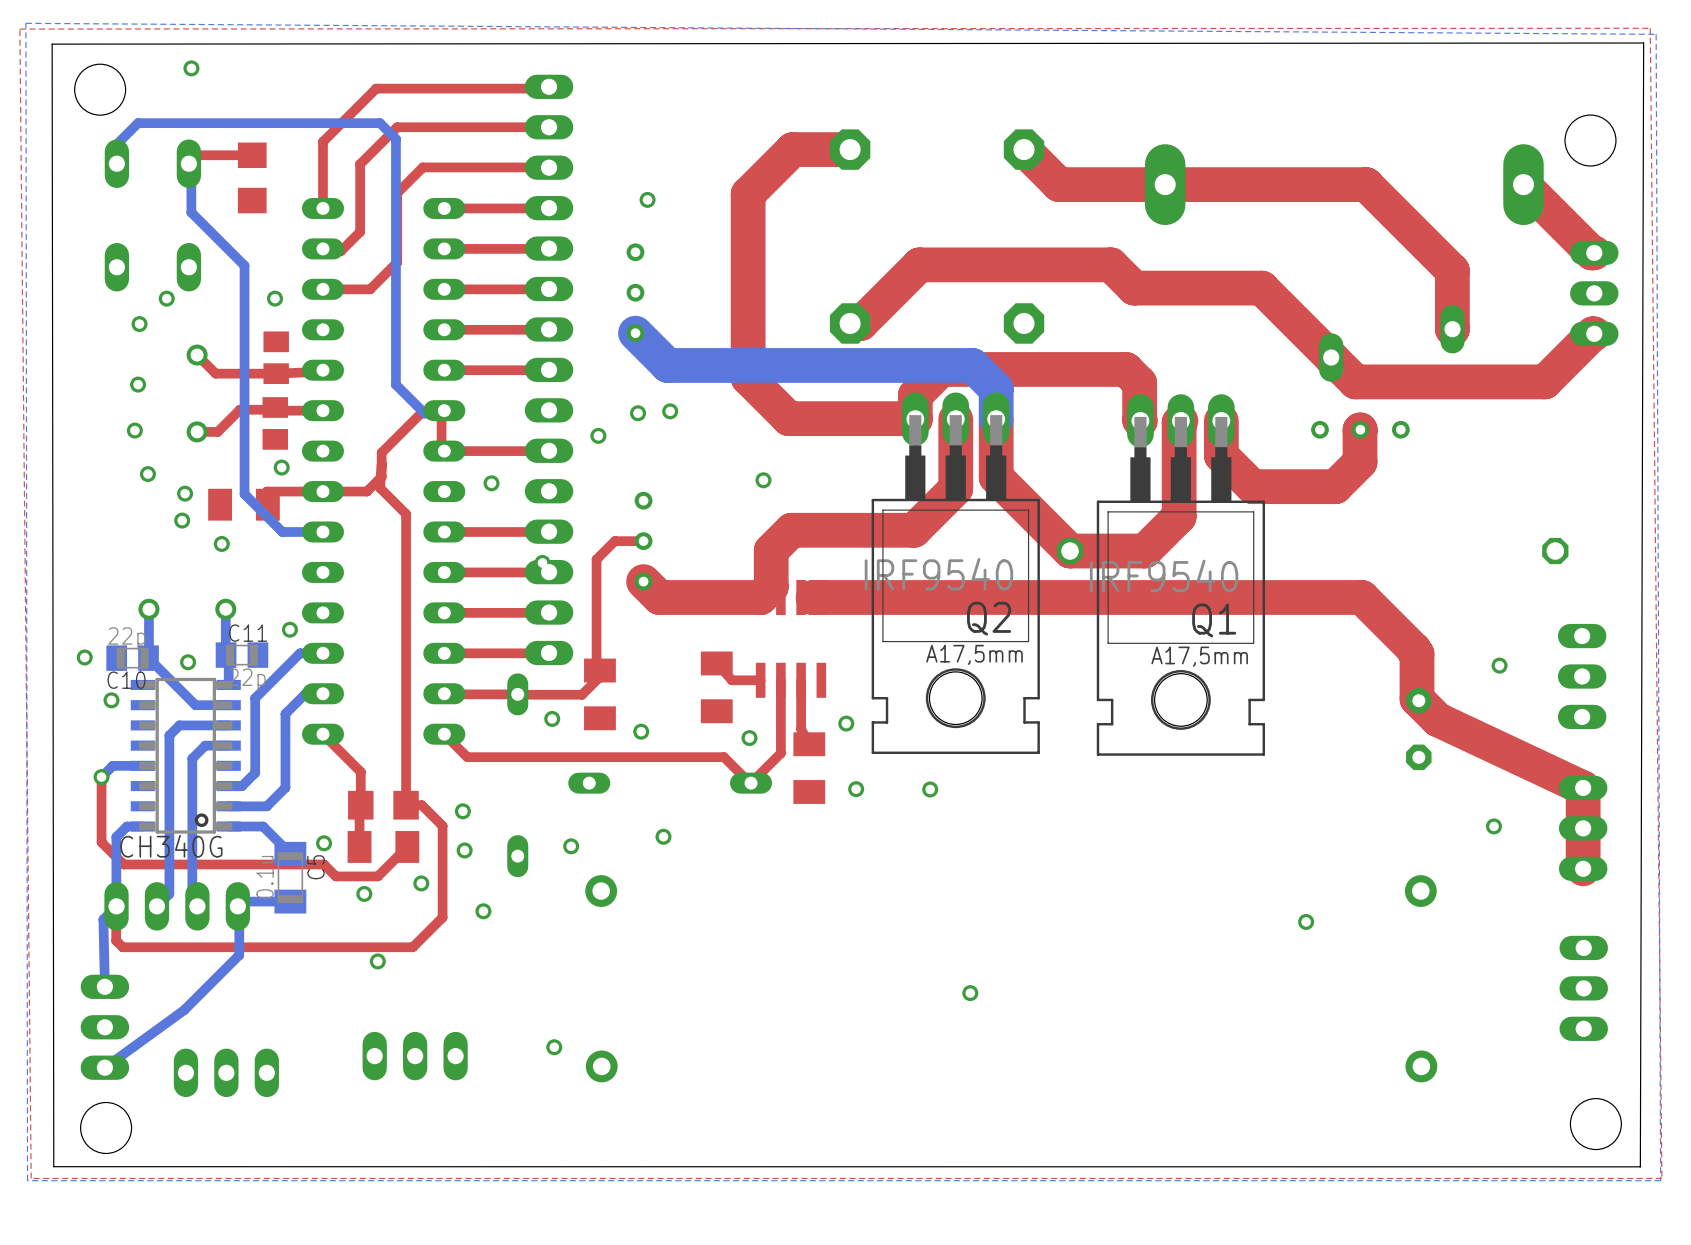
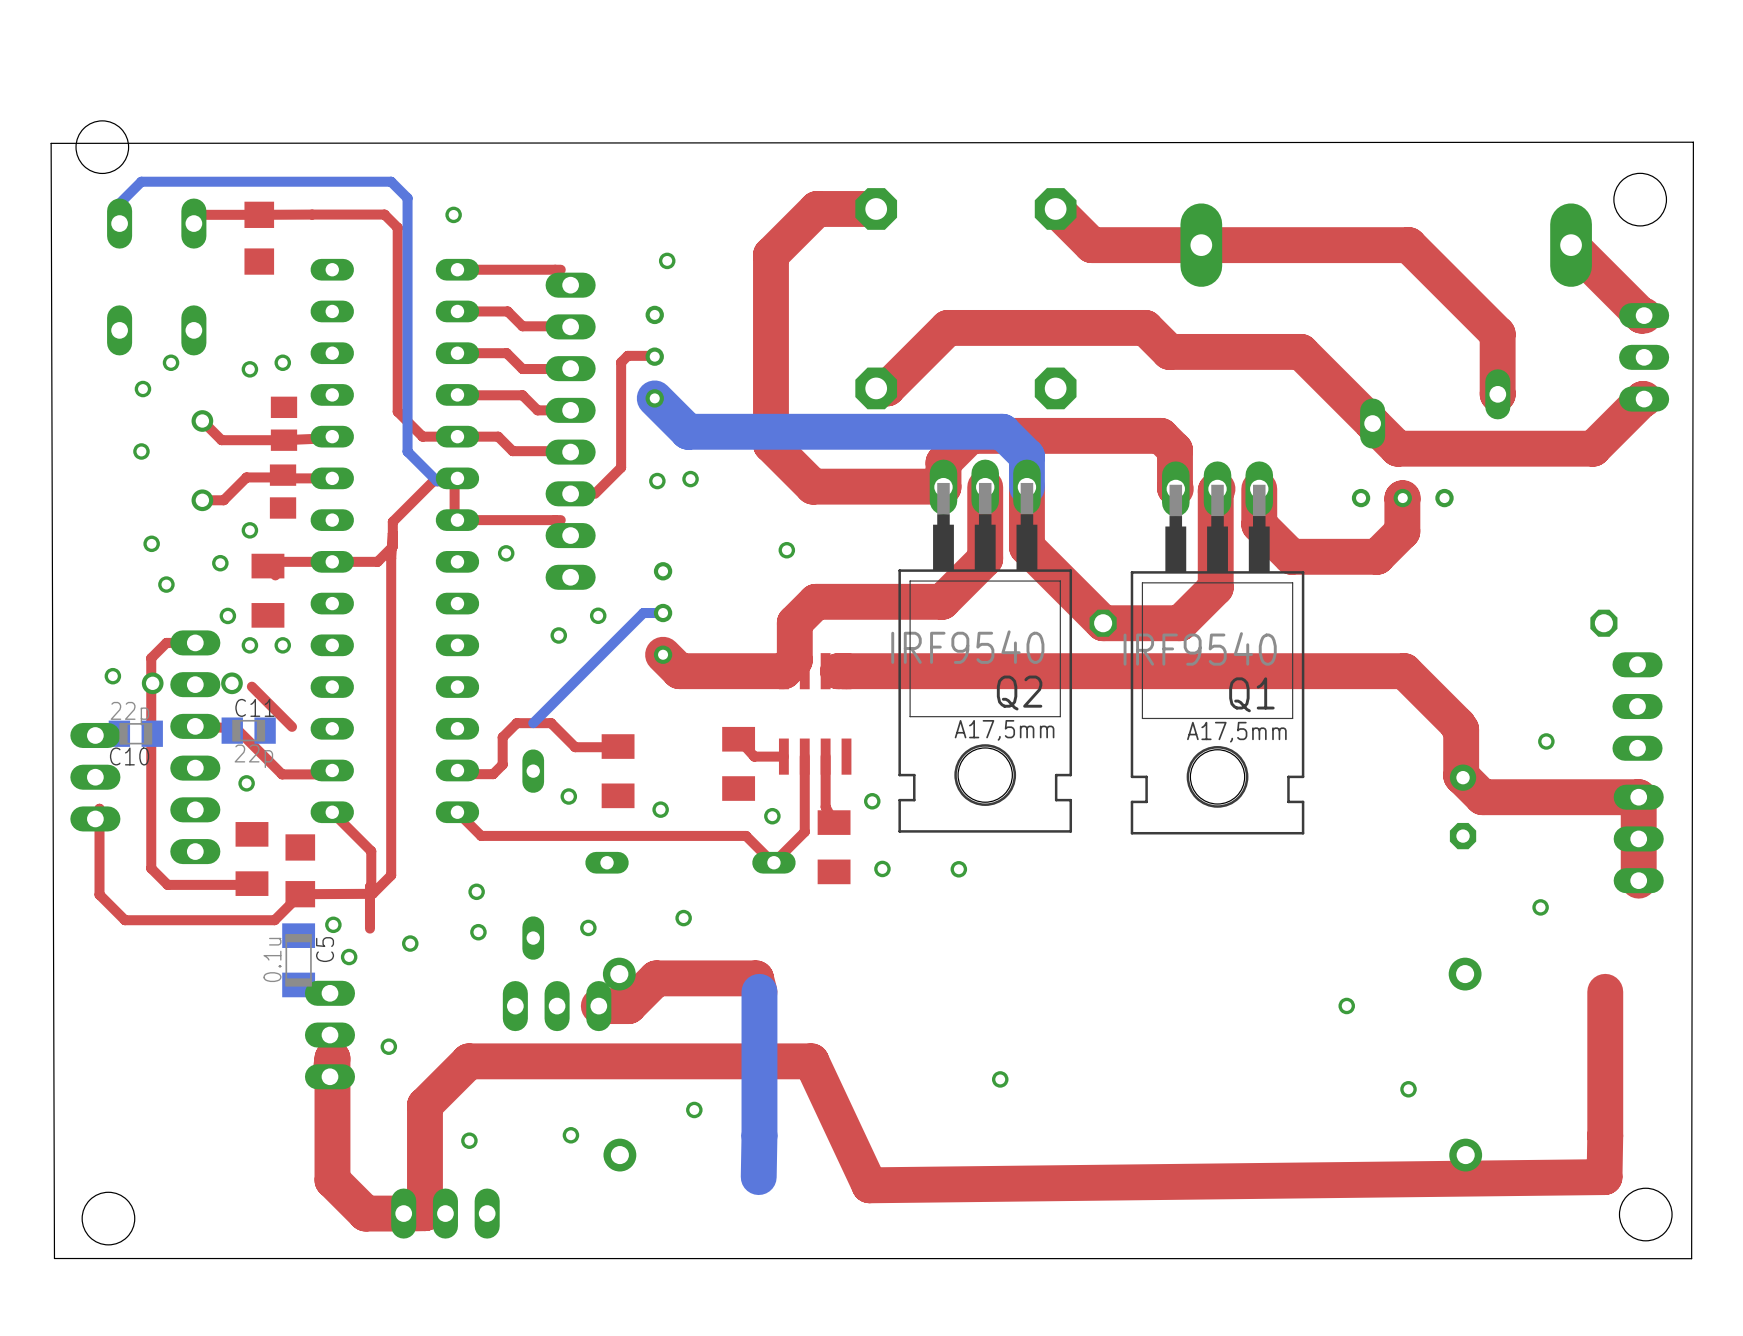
bottom zone outline: (25, 23) (27, 1180) (1660, 1180) (1656, 34) (25, 23) -> none
top zone outline: (1650, 28) (19, 29) (31, 1178) (1661, 1178) (1650, 28) -> none
via: (191, 68) -> none
part footprint: [524, 74, 574, 666] -> [545, 272, 596, 590]
top track: (549, 86) (547, 88) (376, 88) (322, 141) (322, 208) -> none
top track: (549, 127) (397, 127) (360, 164) (360, 231) (340, 251) (325, 251) (322, 248) -> none
top track: none -> (259, 214) (384, 214) (397, 227) (397, 411) (422, 436) (457, 436)
via: none -> (453, 214)
bottom track: (188, 163) (191, 166) (191, 212) (244, 265) (244, 494) (282, 531) (322, 531) -> none
top track: (549, 167) (422, 167) (397, 193) (397, 262) (370, 289) (322, 289) -> none
top track: (544, 248) (493, 248) -> (570, 326) (522, 326) (507, 311)
top track: (544, 289) (492, 289) -> (570, 368) (522, 369) (506, 353)
top track: none -> (654, 356) (627, 355) (621, 362) (621, 467) (594, 493)
via: none -> (249, 369)
top track: (544, 329) (444, 329) -> (570, 410) (537, 410) (522, 395) (457, 394)
top track: (544, 370) (483, 370) -> (570, 452) (512, 451) (498, 436)
via: (134, 430) -> none
via: (598, 435) -> none
via: none -> (249, 530)
via: (281, 467) -> none
top track: (380, 488) (406, 514) (406, 805) (421, 805) (442, 825) (442, 917) (412, 947) (122, 947) (116, 940) (116, 906) -> (391, 558) (391, 875) (372, 893) (300, 894) (274, 920) (124, 920) (99, 894) (99, 808) (95, 818)
via: none -> (220, 563)
via: (185, 493) -> none
part rotation: 0° (243, 504) -> 90° clockwise (267, 590)
via: none -> (166, 584)
via: (182, 520) -> none
top track: (544, 531) (444, 531) -> none
top track: (643, 541) (614, 541) (596, 559) (596, 677) (598, 678) -> none
bottom track: none -> (663, 613) (643, 613) (533, 723)
via: none -> (598, 615)
top track: none -> (195, 642) (166, 642) (151, 658) (151, 868) (167, 884) (251, 883)
via: none -> (249, 645)
via: none -> (282, 645)
top track: (544, 572) (444, 572) -> none
via: none -> (112, 676)
bottom track: (148, 609) (148, 658) (195, 705) (228, 705) -> none
bottom track: (225, 609) (225, 654) (228, 657) (228, 684) -> none
top track: none -> (251, 686) (292, 726)
top track: (544, 612) (444, 612) -> none
via: (289, 629) -> none
part: none -> (1637, 706)
top track: none -> (195, 726) (236, 728) (282, 774) (328, 774) (332, 770)
bottom track: (322, 653) (300, 653) (255, 698) (255, 772) (242, 786) (228, 786) -> none
top track: (544, 653) (444, 653) -> none
via: (84, 657) -> none
via: (188, 662) -> none
top track: (599, 670) (599, 676) (582, 694) (444, 694) -> (618, 746) (575, 747) (551, 723) (516, 723) (502, 737) (502, 764) (493, 774) (461, 774) (458, 771)
part: none -> (195, 747)
part: (1582, 676) -> none
bottom track: (322, 693) (305, 693) (285, 713) (285, 787) (266, 806) (228, 806) -> none
part: none -> (95, 777)
via: (111, 700) -> none
via: none -> (246, 783)
top track: (1437, 719) (1583, 787) (1583, 868) -> (1482, 797) (1638, 797) (1638, 880)
bottom track: (228, 725) (179, 725) (169, 735) (169, 893) (156, 906) -> none
bottom track: (228, 745) (205, 745) (192, 758) (192, 901) (197, 906) -> none
part: (185, 755) -> none
part: none -> (1638, 838)
bottom track: (142, 765) (112, 765) (101, 777) -> none
top track: (101, 777) (101, 842) (123, 864) (323, 864) (335, 876) (377, 876) (407, 846) -> none
via: (101, 777) -> none
part: none -> (251, 858)
part rotation: 0° (383, 805) -> 90° clockwise (300, 870)
part position: (383, 805) -> (300, 870)
bottom track: (142, 826) (126, 826) (116, 837) (116, 906) -> none
bottom track: (228, 826) (263, 826) (290, 853) -> none
part: (1583, 828) -> none
part: (383, 846) -> none
via: none -> (410, 943)
via: none -> (349, 957)
via: (421, 883) -> none
via: (364, 893) -> none
bottom track: (290, 901) (242, 901) (237, 906) (239, 955) (184, 1010) (104, 1067) -> none
bottom track: (116, 906) (103, 919) (104, 986) -> none
part: (177, 906) -> none
top track: none -> (759, 991) (755, 978) (656, 978) (628, 1006) (598, 1006)
bottom track: none -> (759, 991) (758, 1177)
top track: none -> (1605, 991) (1604, 1177) (869, 1185) (811, 1061) (468, 1061) (424, 1105) (424, 1213) (365, 1213) (332, 1180) (332, 1058) (329, 1076)
via: (483, 911) -> none
part: none -> (557, 1006)
part: none -> (329, 1035)
part: (1583, 988) -> none
via: none -> (1408, 1089)
via: none -> (694, 1109)
part: (104, 1027) -> none
via: none -> (469, 1140)
part position: (415, 1056) -> (445, 1213)
part: (226, 1072) -> none
board edge: (53, 1166) (52, 44) (1643, 43) (1640, 1166) -> (54, 1258) (51, 143) (1693, 142) (1691, 1258)

